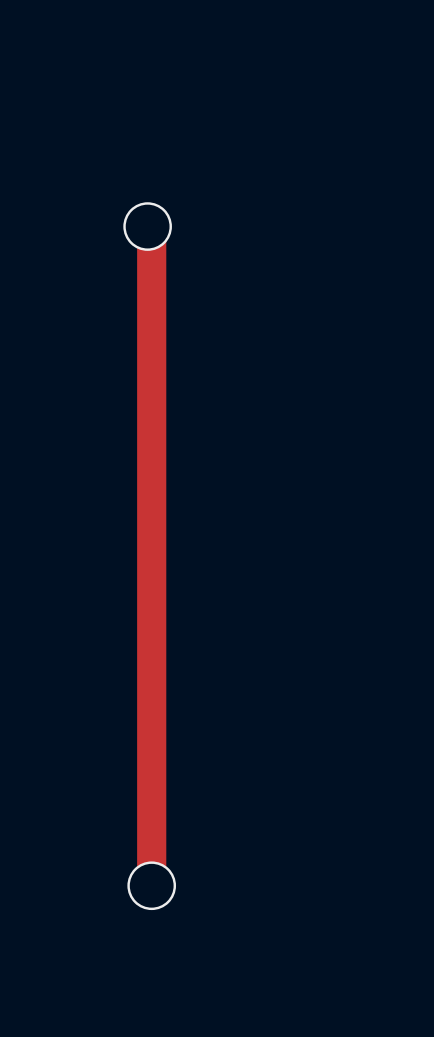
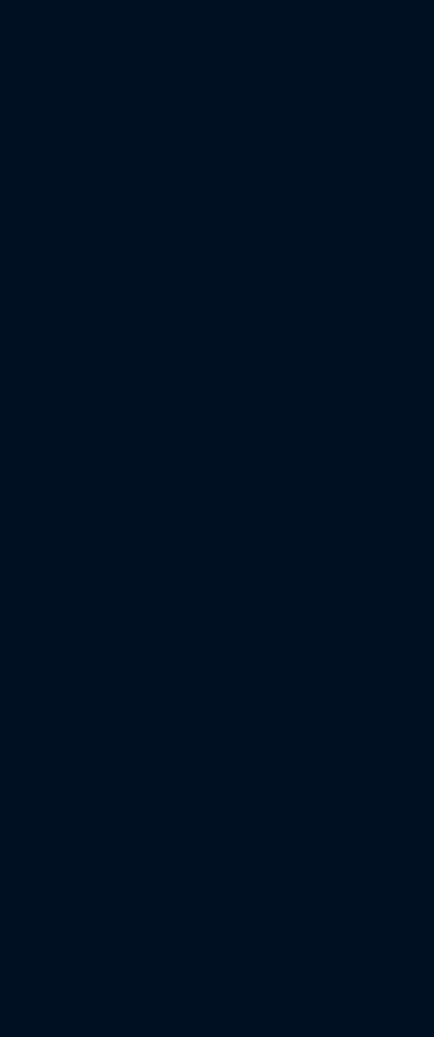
track: (147, 226) (151, 230) (151, 885) -> none
via: (147, 226) -> none
via: (151, 885) -> none

